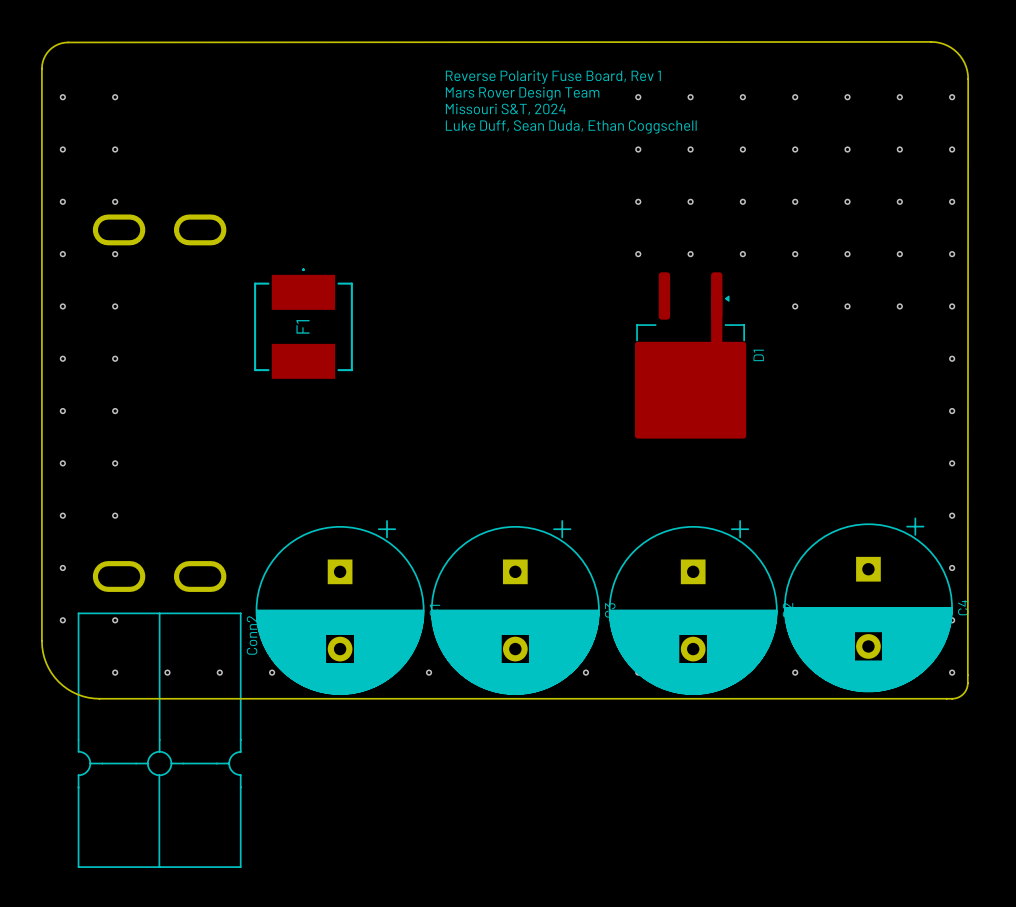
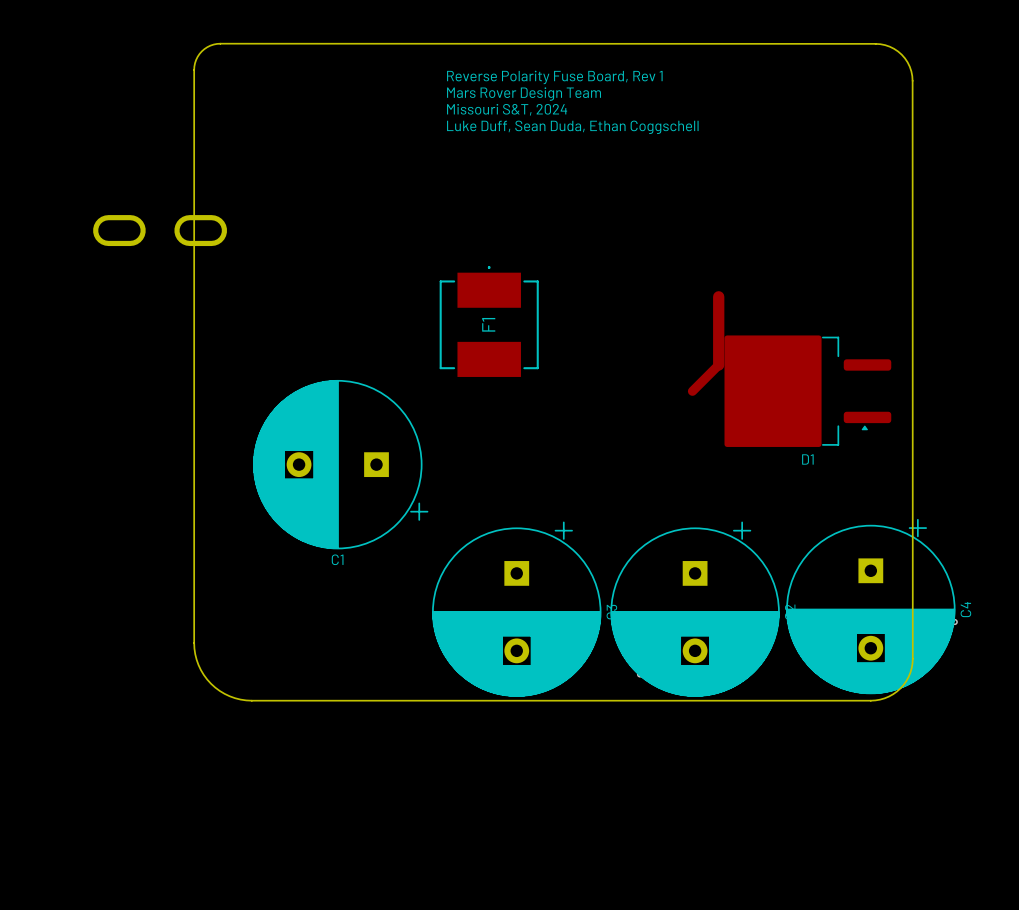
via: (62, 97) -> none
via: (115, 97) -> none
via: (638, 97) -> none
via: (690, 97) -> none
via: (742, 97) -> none
via: (795, 97) -> none
via: (847, 97) -> none
via: (899, 97) -> none
via: (952, 97) -> none
via: (62, 149) -> none
via: (115, 149) -> none
via: (638, 149) -> none
via: (690, 149) -> none
via: (742, 149) -> none
via: (795, 149) -> none
via: (847, 149) -> none
via: (899, 149) -> none
via: (952, 149) -> none
via: (62, 201) -> none
via: (115, 201) -> none
via: (638, 201) -> none
via: (690, 201) -> none
via: (742, 201) -> none
via: (795, 201) -> none
via: (847, 201) -> none
via: (899, 201) -> none
via: (952, 201) -> none
via: (62, 254) -> none
via: (115, 254) -> none
via: (638, 254) -> none
via: (690, 254) -> none
via: (742, 254) -> none
via: (795, 254) -> none
via: (847, 254) -> none
via: (899, 254) -> none
via: (952, 254) -> none
via: (62, 306) -> none
via: (115, 306) -> none
via: (795, 306) -> none
via: (847, 306) -> none
via: (899, 306) -> none
via: (952, 306) -> none
F1 position: (303, 323) -> (489, 321)
D1 rotation: 0° (690, 355) -> 90° clockwise (807, 391)
D1 position: (690, 355) -> (807, 391)
via: (62, 358) -> none
via: (115, 358) -> none
via: (952, 358) -> none
via: (62, 411) -> none
via: (115, 411) -> none
via: (952, 411) -> none
via: (62, 463) -> none
via: (115, 463) -> none
via: (952, 463) -> none
via: (62, 515) -> none
via: (115, 515) -> none
via: (952, 515) -> none
via: (62, 567) -> none
via: (952, 567) -> none
C1 rotation: 0° (340, 607) -> 90° clockwise (340, 464)
C1 position: (340, 607) -> (340, 464)
via: (62, 620) -> none
via: (115, 620) -> none
via: (115, 672) -> none
via: (167, 672) -> none
via: (219, 672) -> none
via: (272, 672) -> none
via: (429, 672) -> none
via: (585, 672) -> none
via: (795, 672) -> none
via: (952, 672) -> none
board edge: (251, 698) (88, 697) (72, 691) (58, 681) (48, 668) (44, 657) (41, 641) (41, 68) (47, 52) (61, 43) (931, 41) (943, 43) (954, 49) (964, 62) (968, 78) (967, 684) (963, 694) (953, 698) (868, 698) -> (251, 700) (229, 696) (211, 683) (198, 665) (194, 642) (194, 69) (196, 59) (201, 51) (210, 45) (220, 43) (875, 43) (889, 46) (901, 54) (909, 66) (912, 80) (912, 658) (908, 676) (900, 688) (884, 698) (870, 700)
Conn2: (159, 714) -> none

